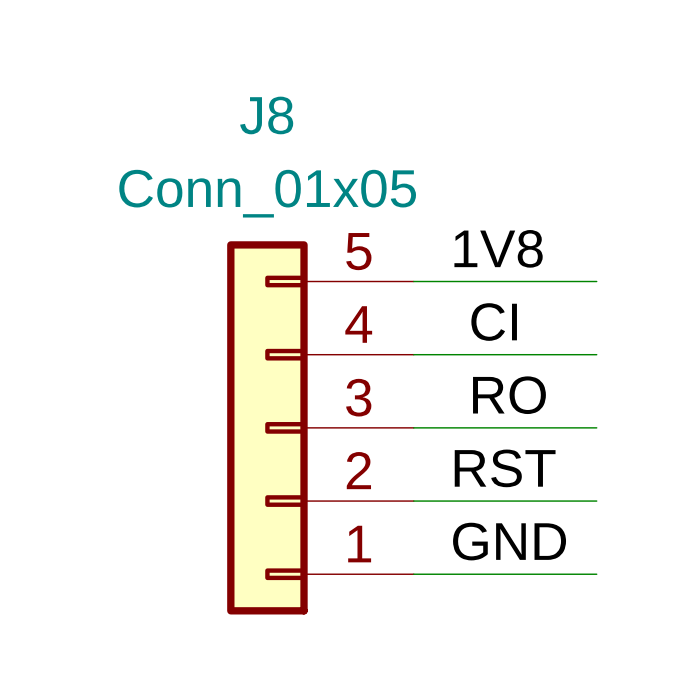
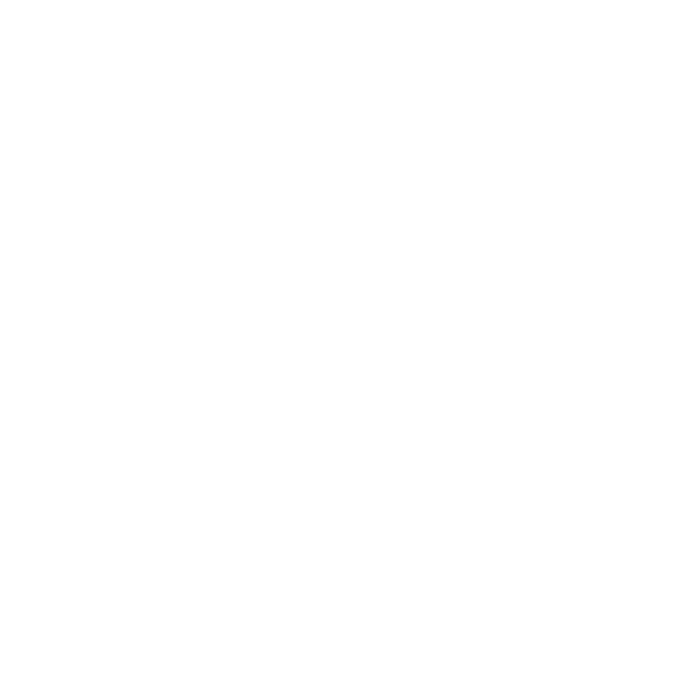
label: 1V8 (498, 248) -> none
wire: (413, 281) (596, 281) -> none
label: CI (494, 322) -> none
wire: (413, 354) (596, 354) -> none
label: RO (509, 395) -> none
J8: Conn_01x05 (320, 427) -> none
wire: (413, 427) (596, 427) -> none
label: RST (505, 468) -> none
wire: (413, 501) (596, 501) -> none
label: GND (509, 541) -> none
wire: (413, 574) (596, 574) -> none

